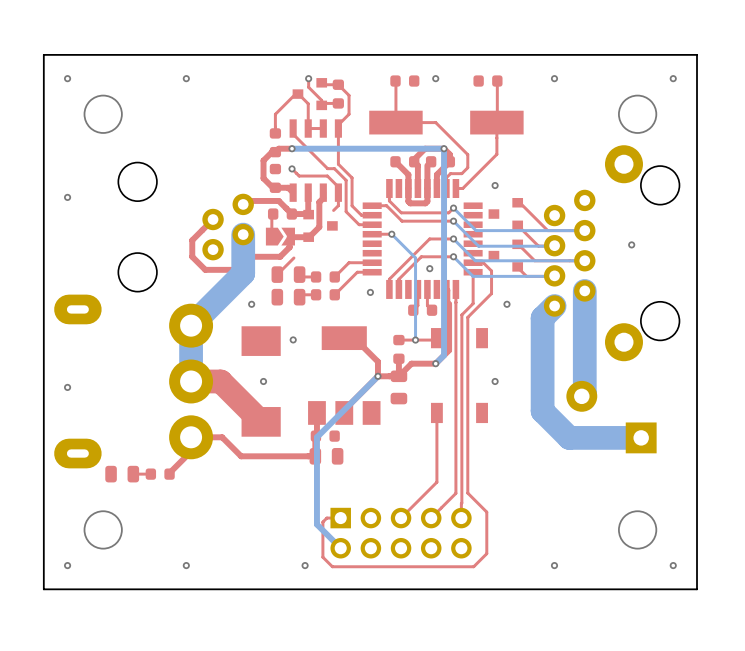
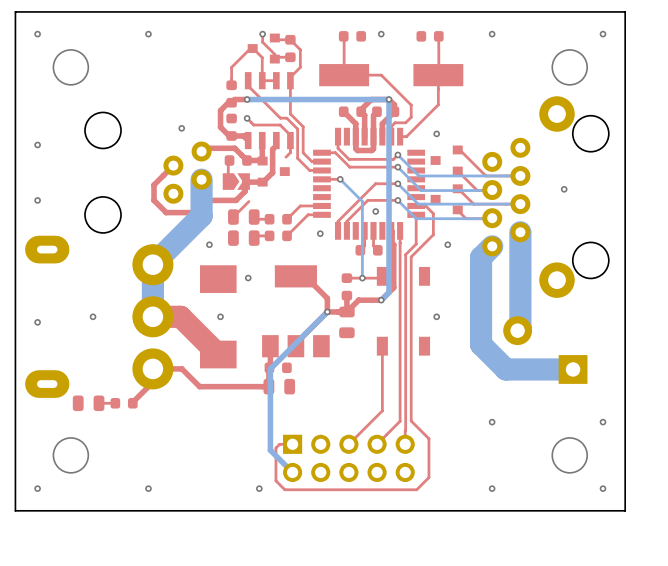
via: none -> (181, 128)
via: none -> (37, 200)
via: none -> (93, 316)
via: none -> (492, 422)
via: none -> (602, 422)

